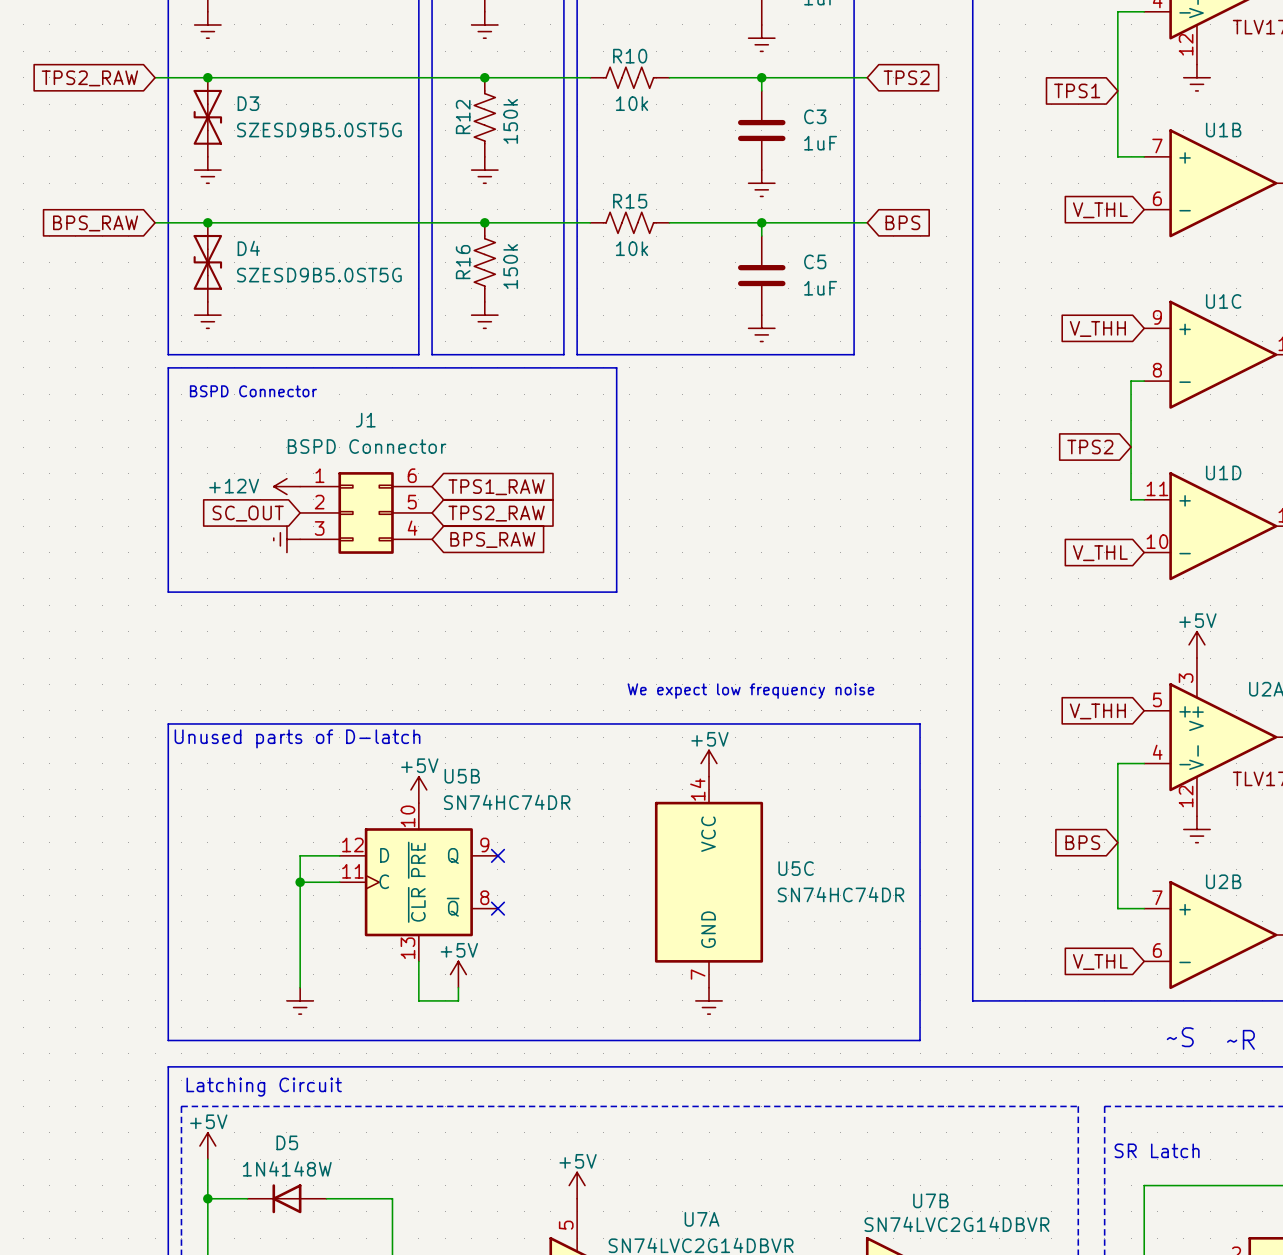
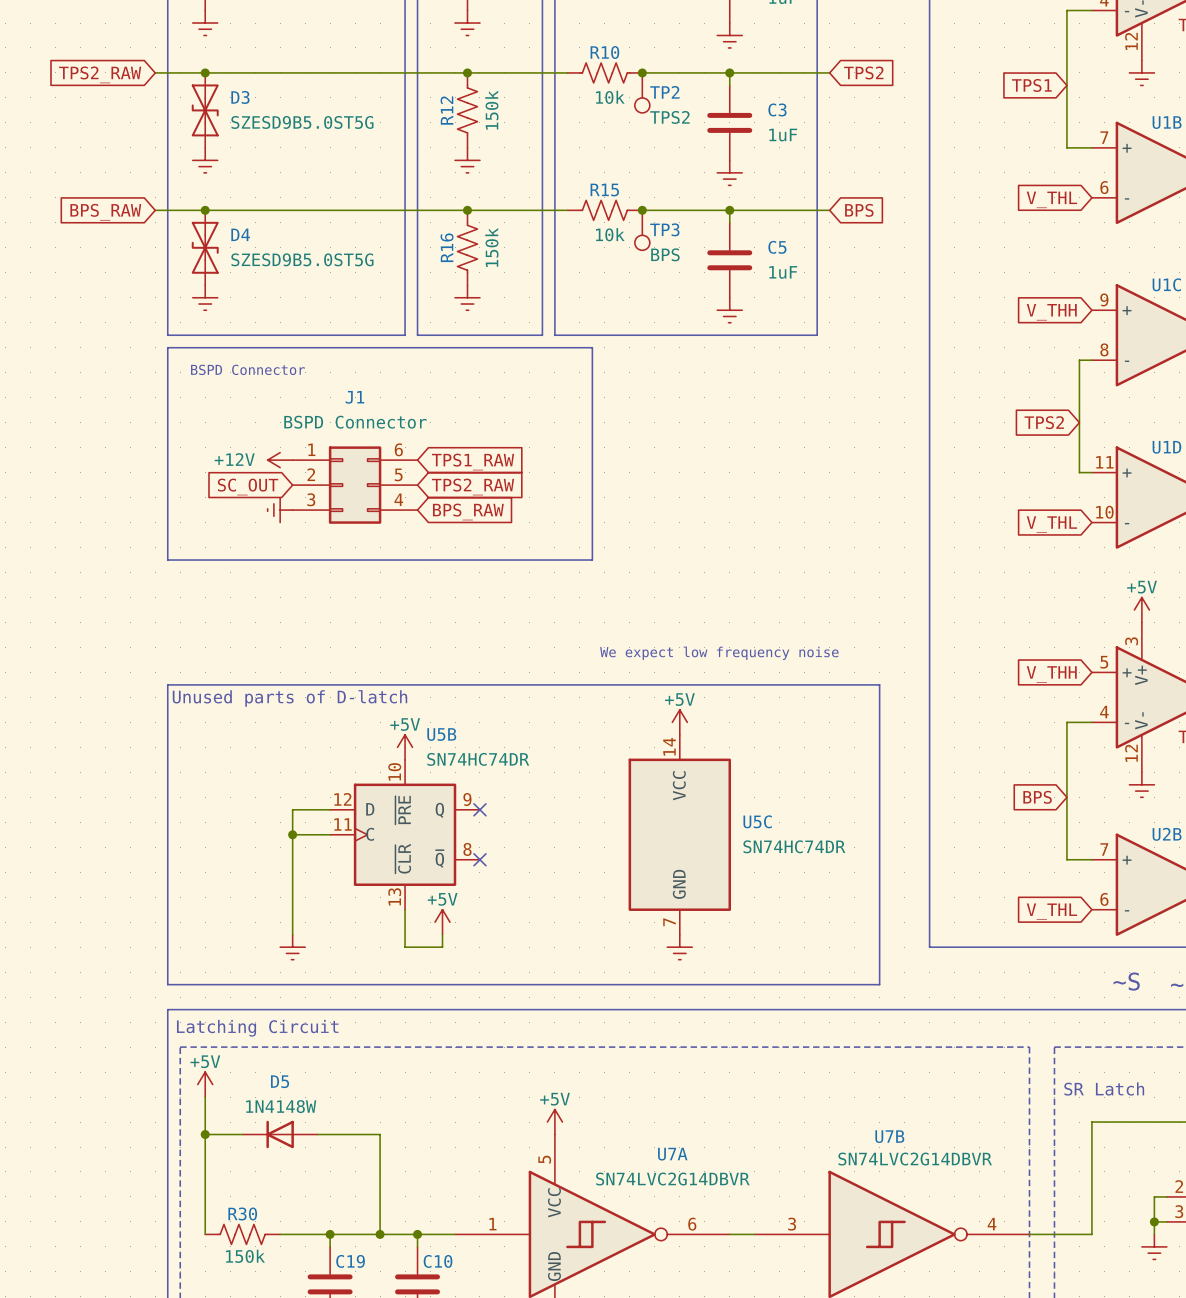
junction: none -> (642, 72)
TP2: none -> TPS2 (642, 92)
junction: none -> (642, 210)
TP3: none -> BPS (642, 230)

